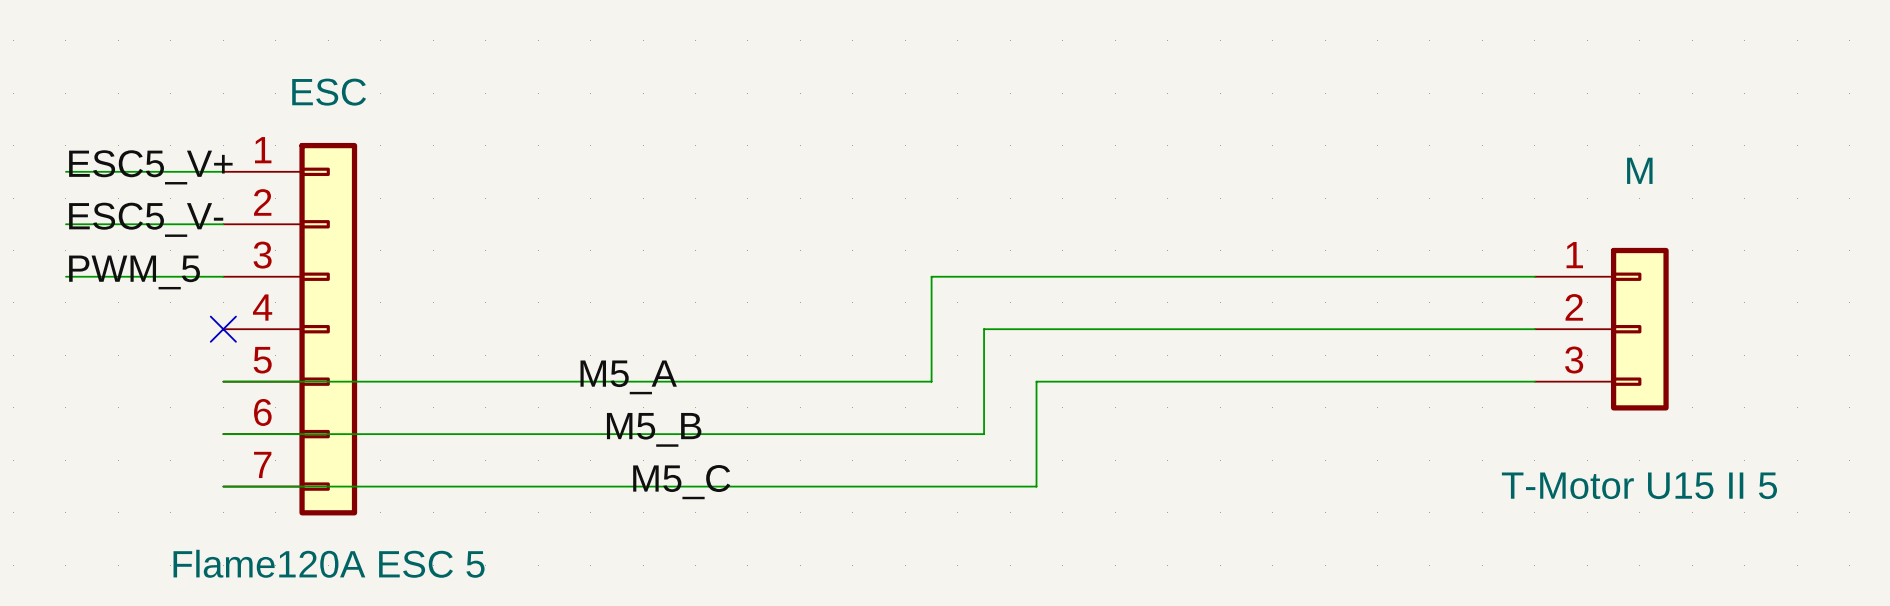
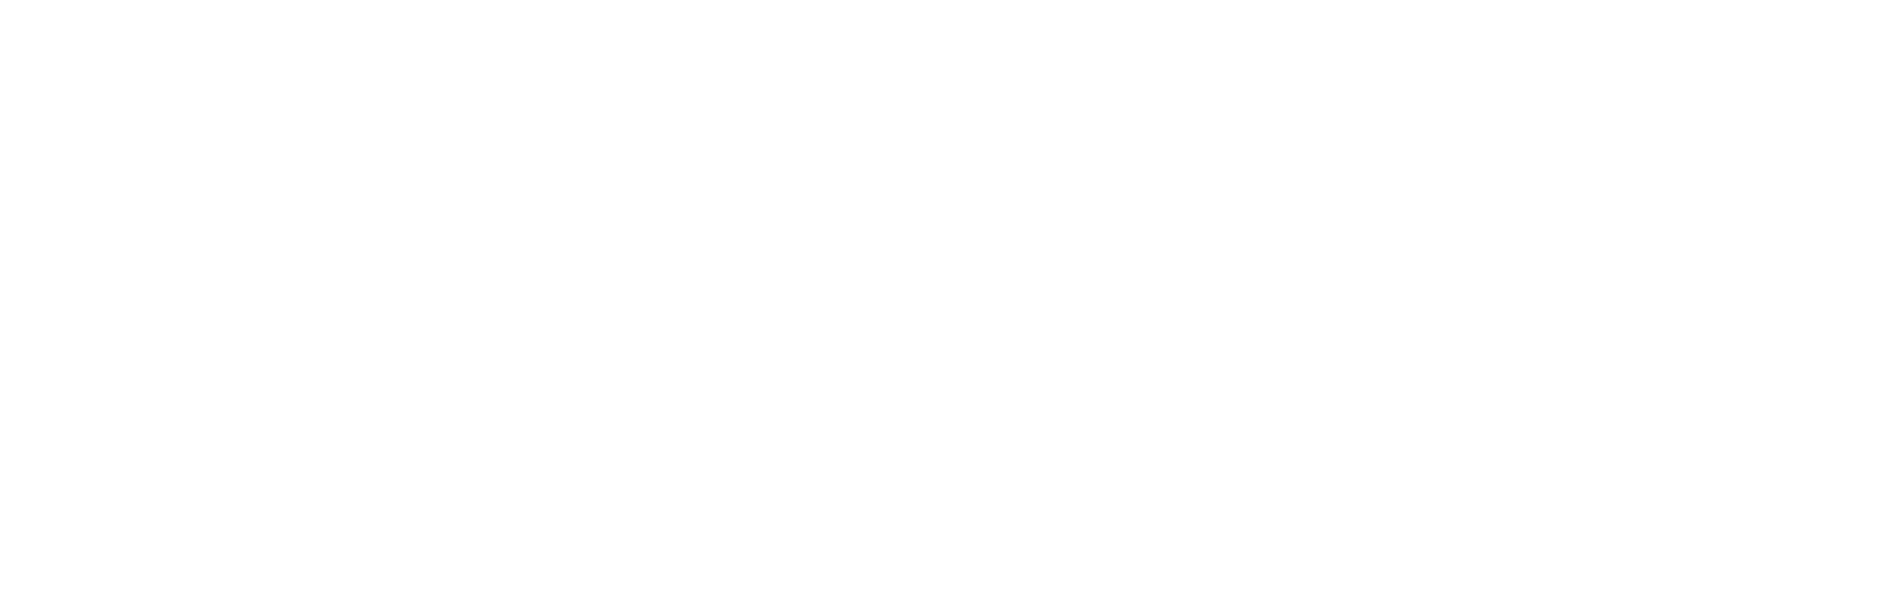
label: ESC5_V+ (150, 167) -> none
wire: (65, 171) (223, 171) -> none
label: ESC5_V- (146, 219) -> none
wire: (65, 224) (223, 224) -> none
label: PWM_5 (134, 272) -> none
wire: (65, 276) (223, 276) -> none
wire: (1534, 276) (931, 276) (931, 381) (223, 381) -> none
no-connect mark: (223, 329) -> none
ESC: Flame120A ESC 5 (290, 329) -> none
wire: (1534, 329) (984, 329) (984, 434) (223, 434) -> none
M: T-Motor U15 II 5 (1601, 329) -> none
label: M5_A (628, 377) -> none
wire: (1534, 381) (1036, 381) (1036, 486) (223, 486) -> none
label: M5_B (654, 429) -> none
label: M5_C (681, 482) -> none

